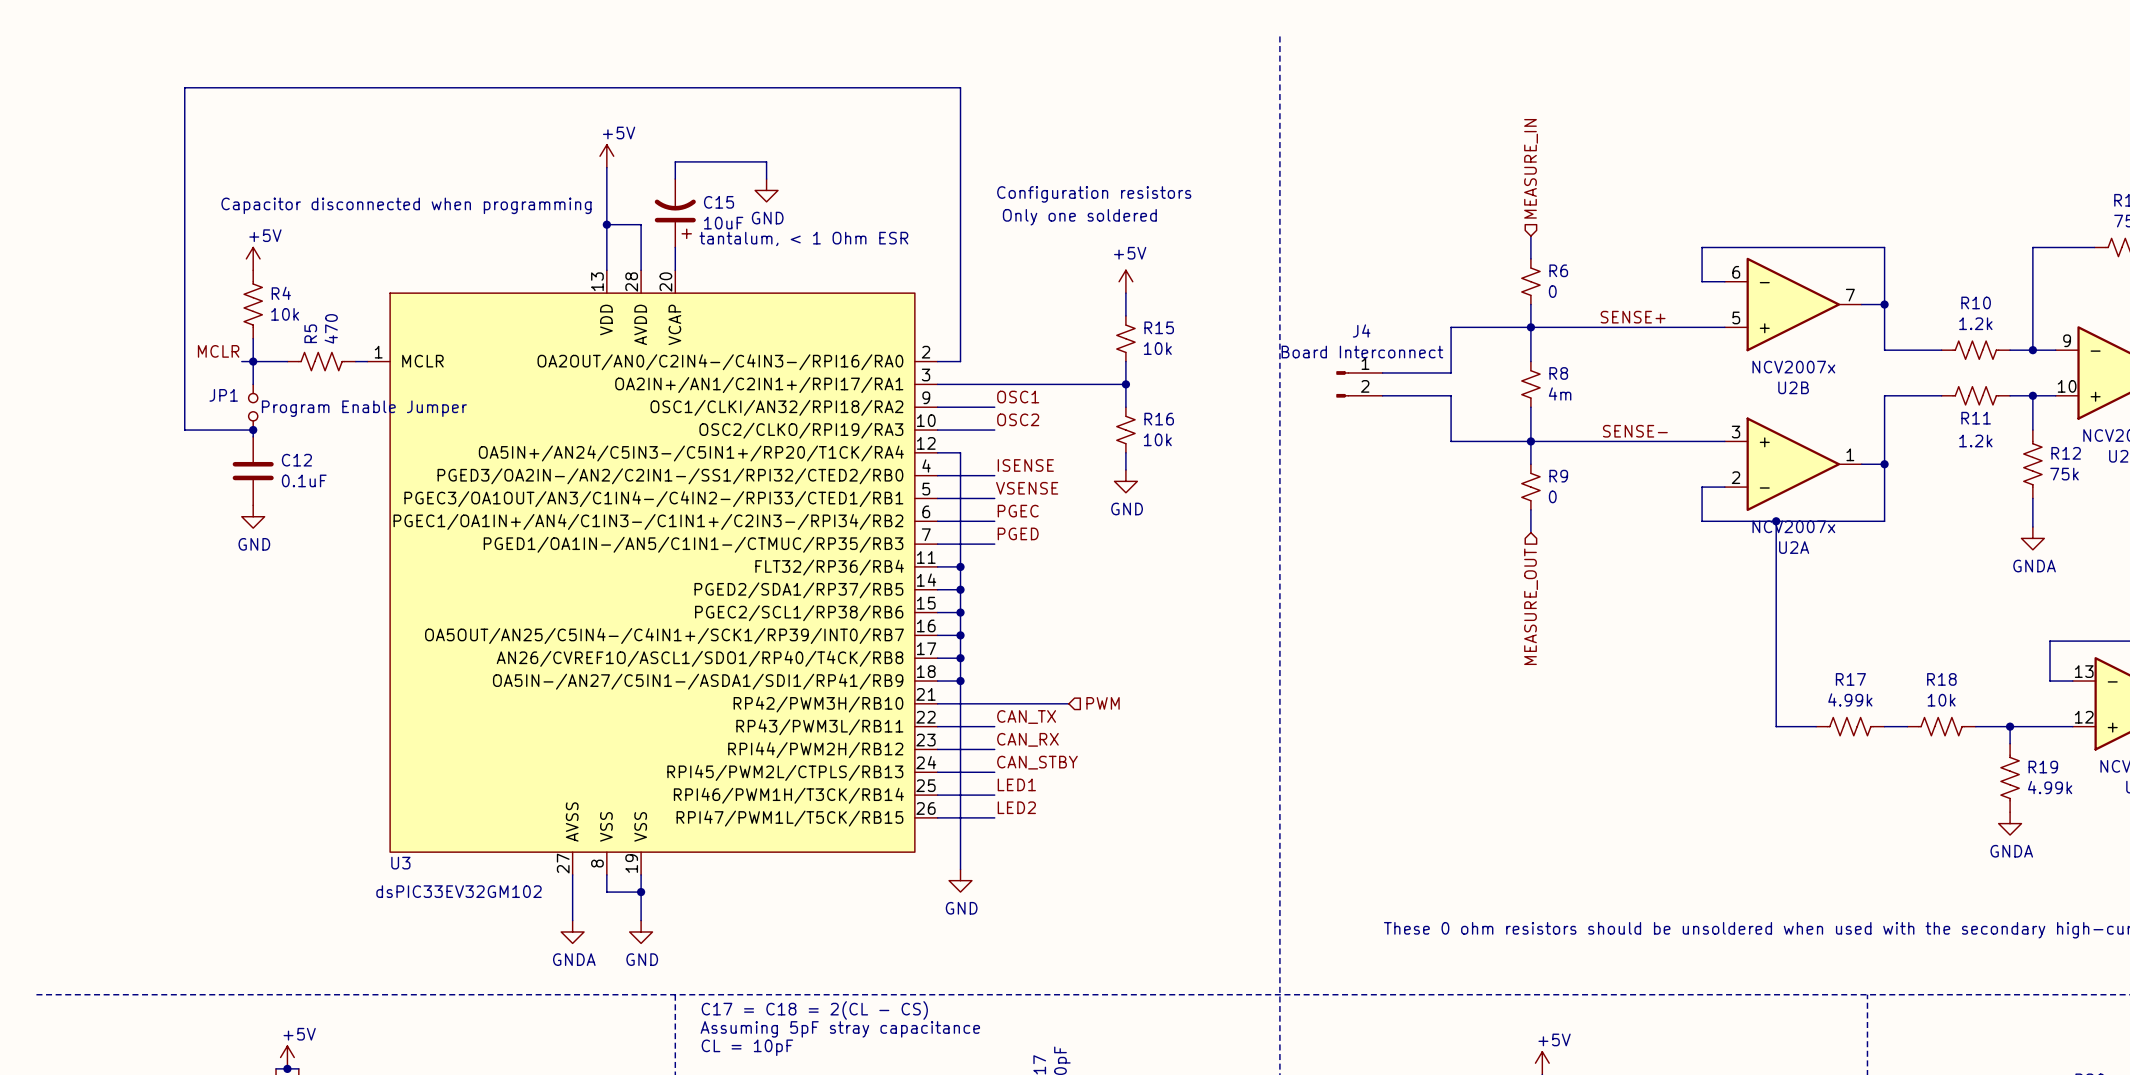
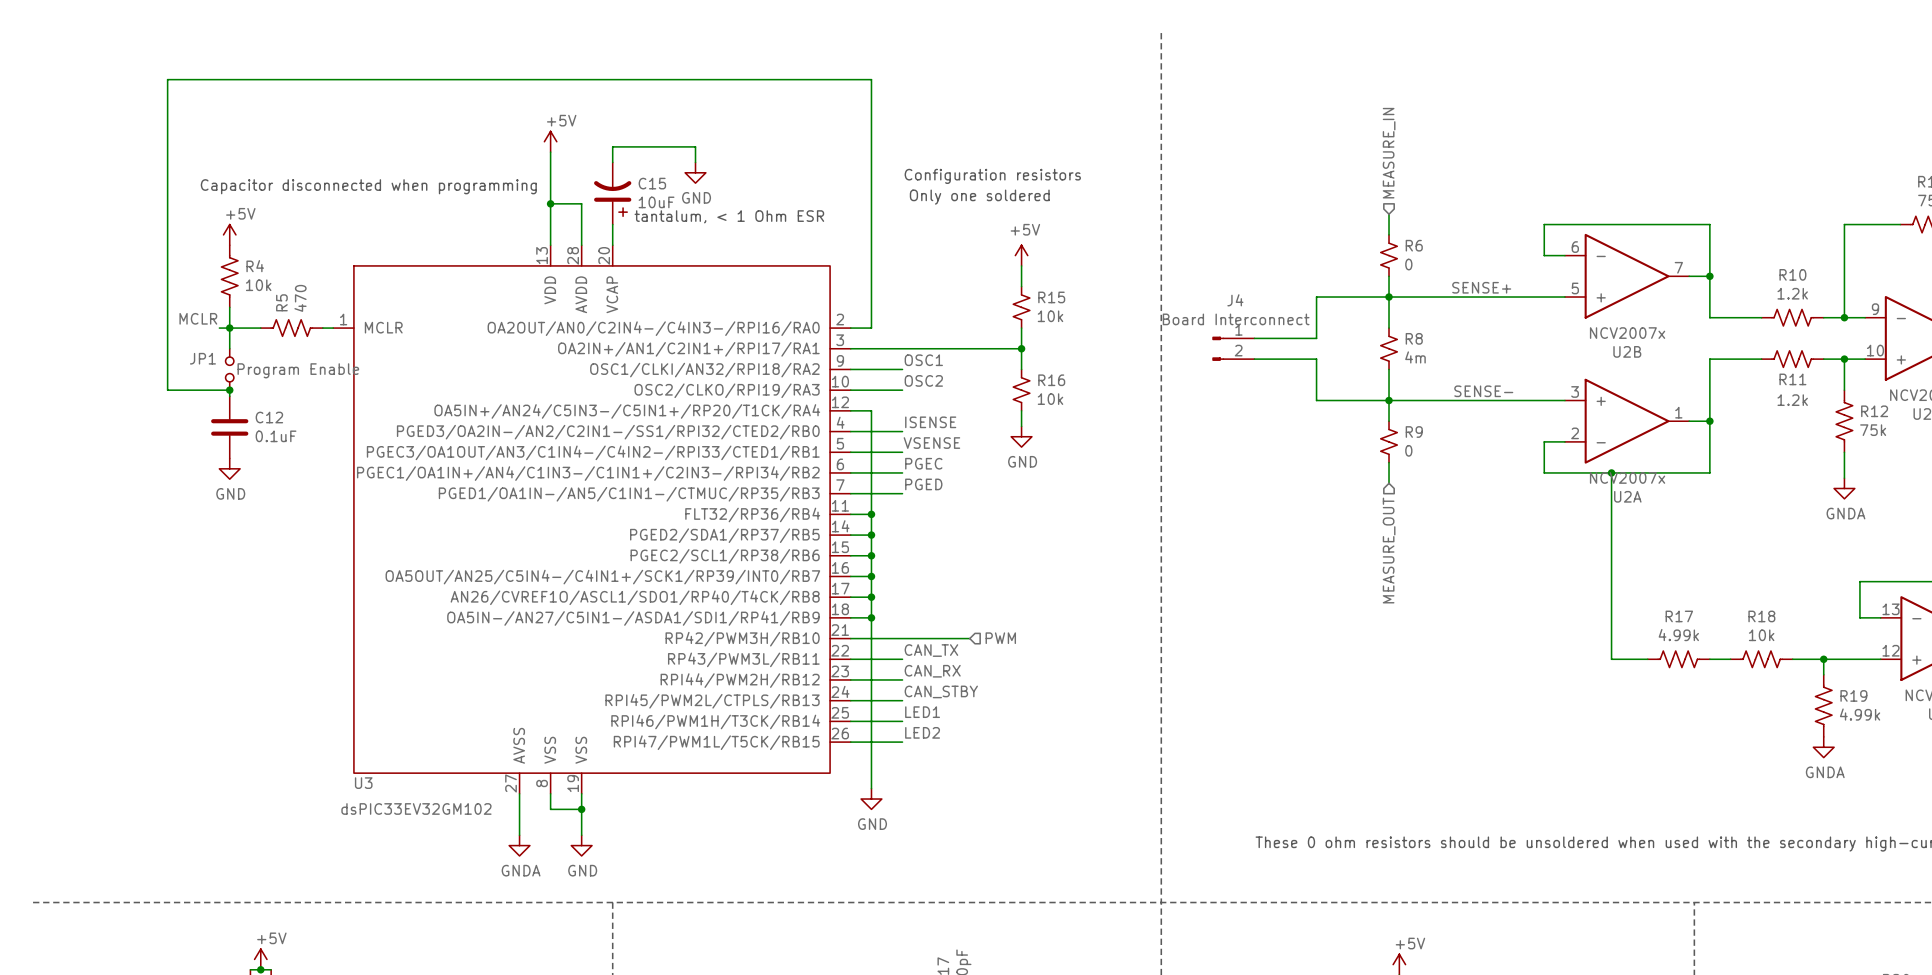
JP1 value: Program Enable Jumper (364, 408) -> Program Enable (298, 370)
text: C17 = C18 = 2(CL - CS) (814, 1010) -> none
text: Assuming 5pF stray capacitance (840, 1029) -> none
text: CL = 10pF (747, 1047) -> none

